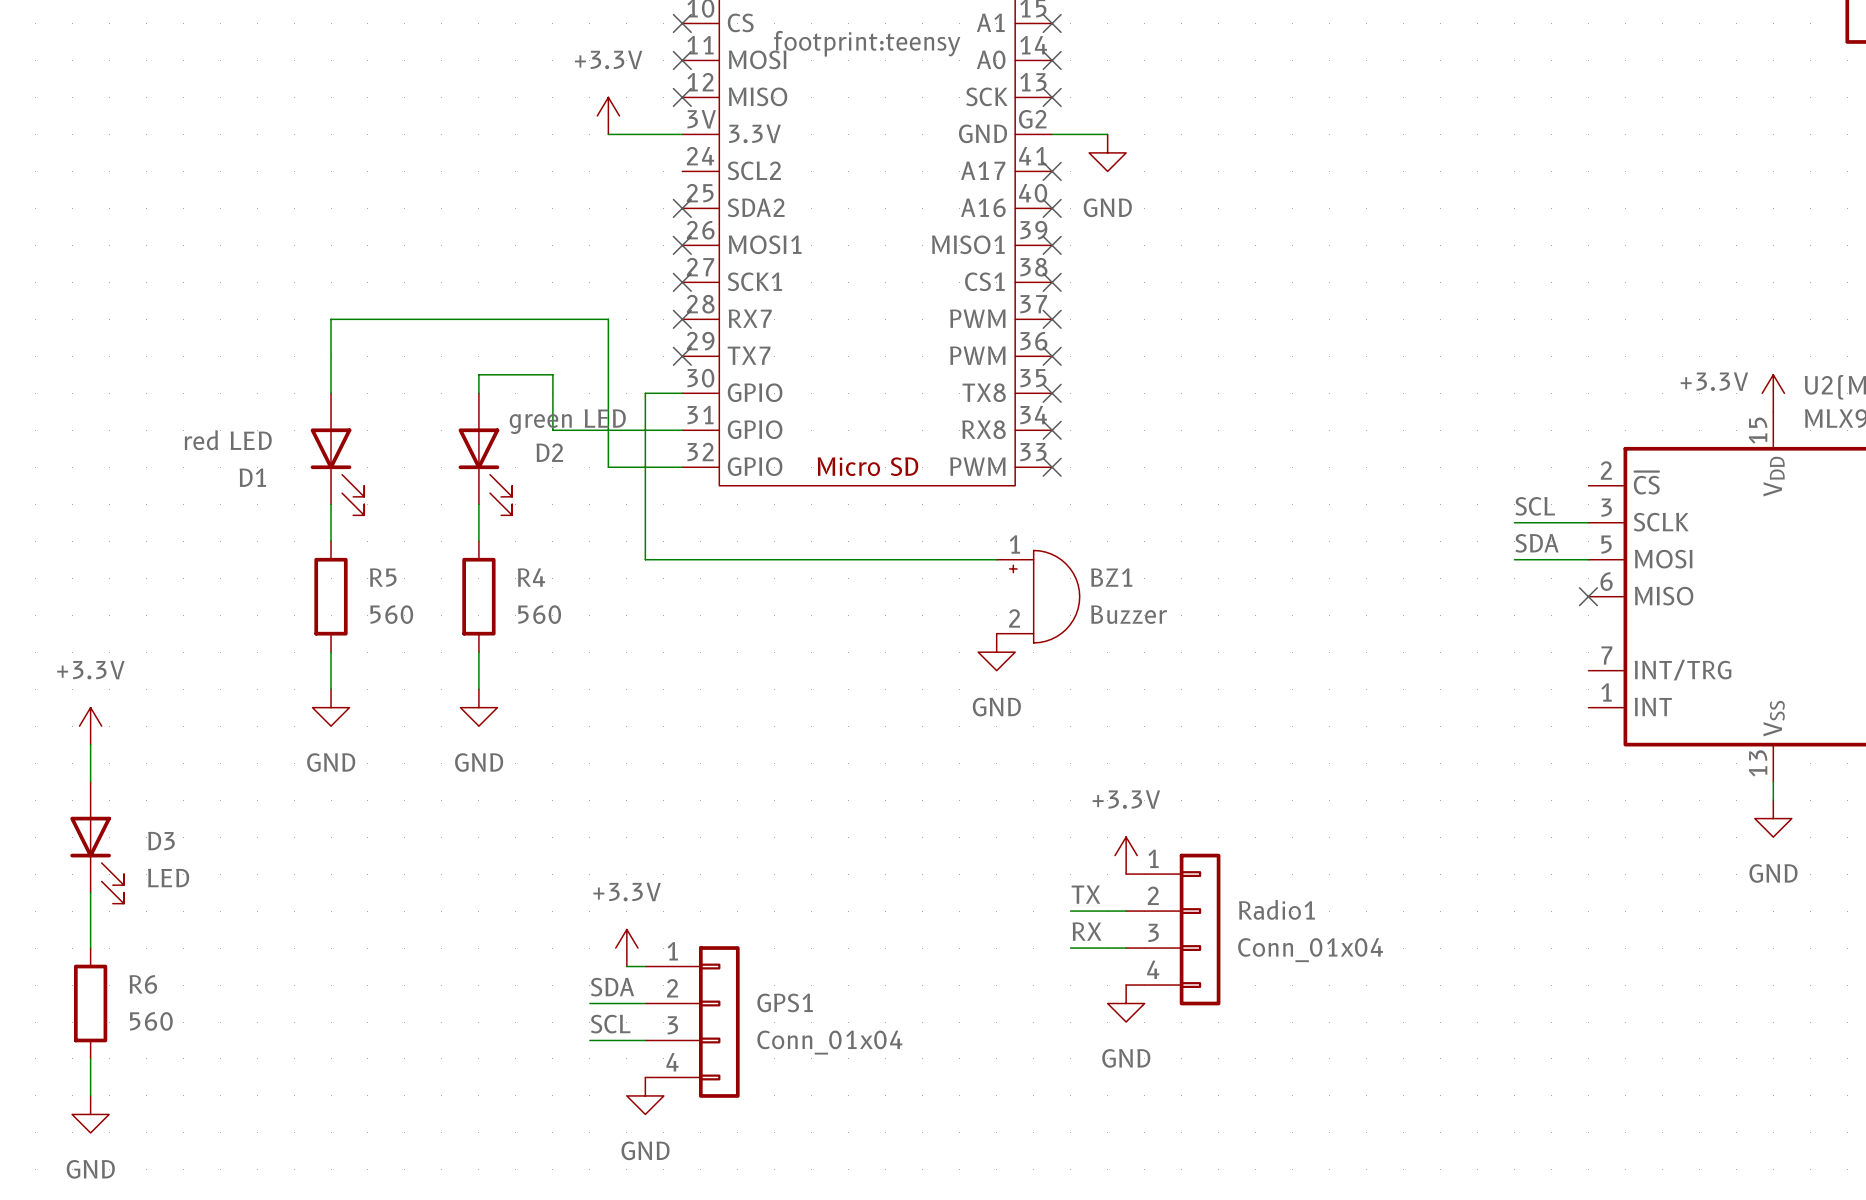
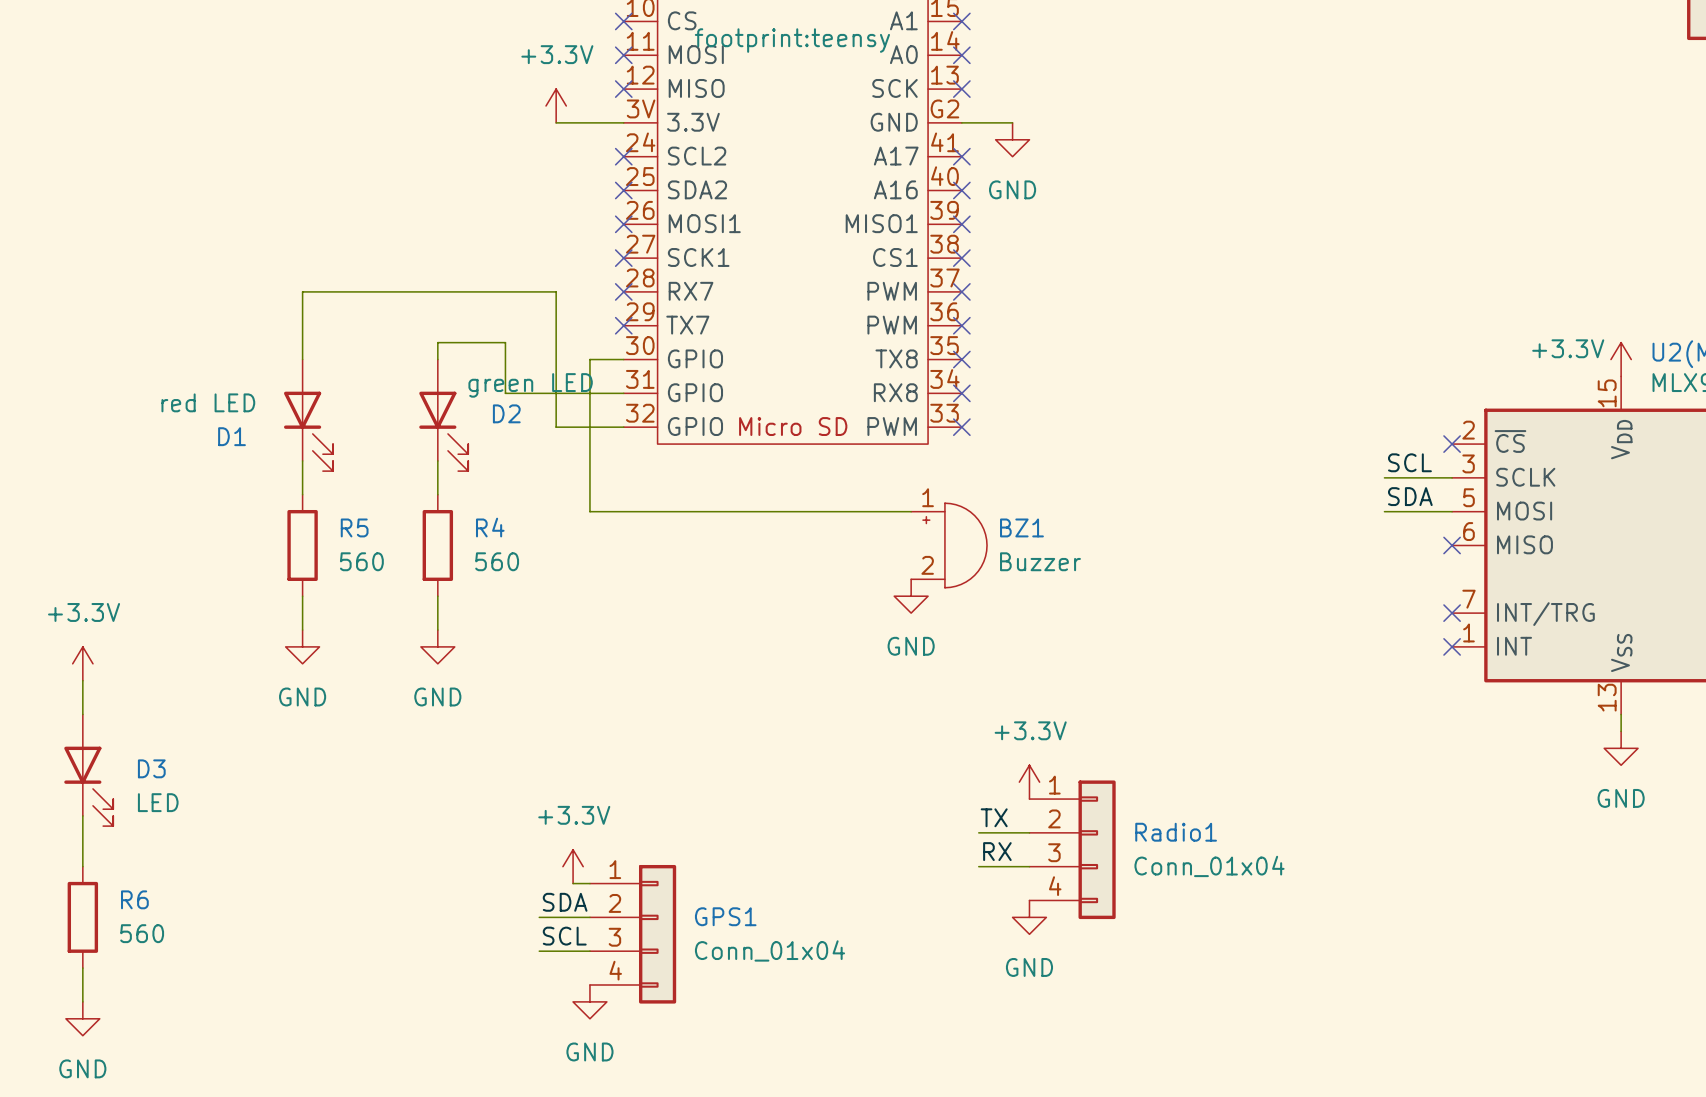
no-connect mark: none -> (623, 156)
no-connect mark: none -> (1452, 444)
no-connect mark: none -> (1452, 613)
no-connect mark: none -> (1452, 646)

